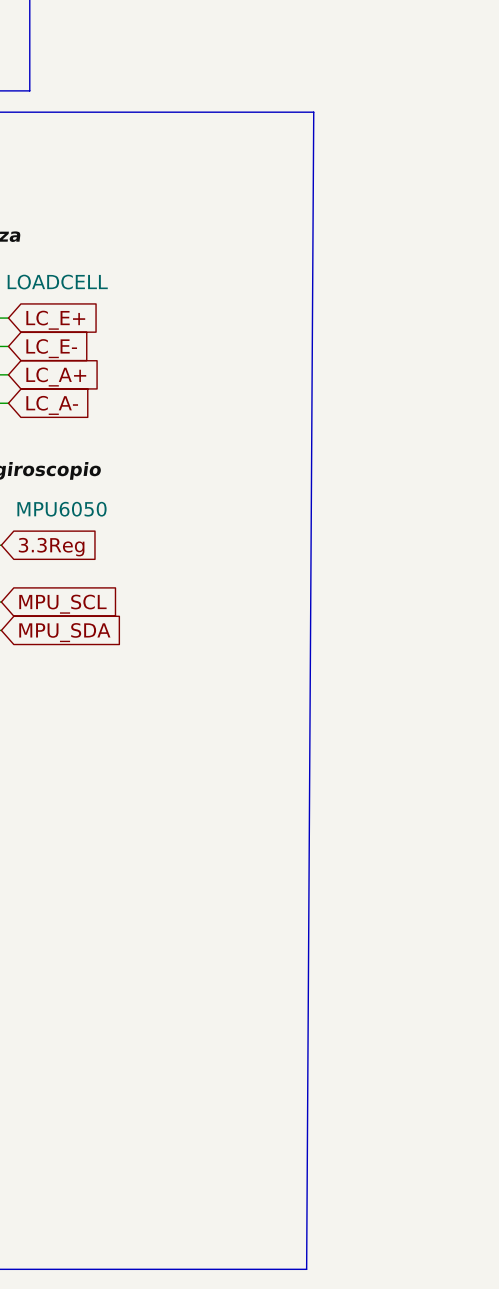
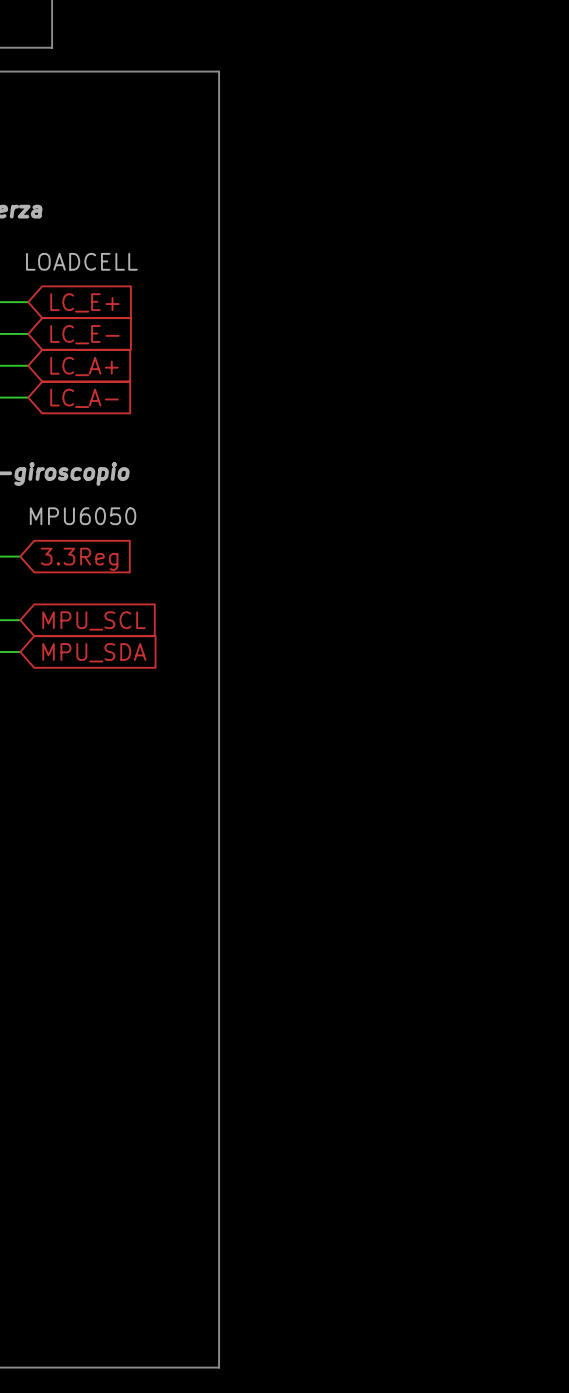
line: (178, 112) (313, 112) (306, 1269) (178, 1269) -> (219, 71) (219, 1367)

